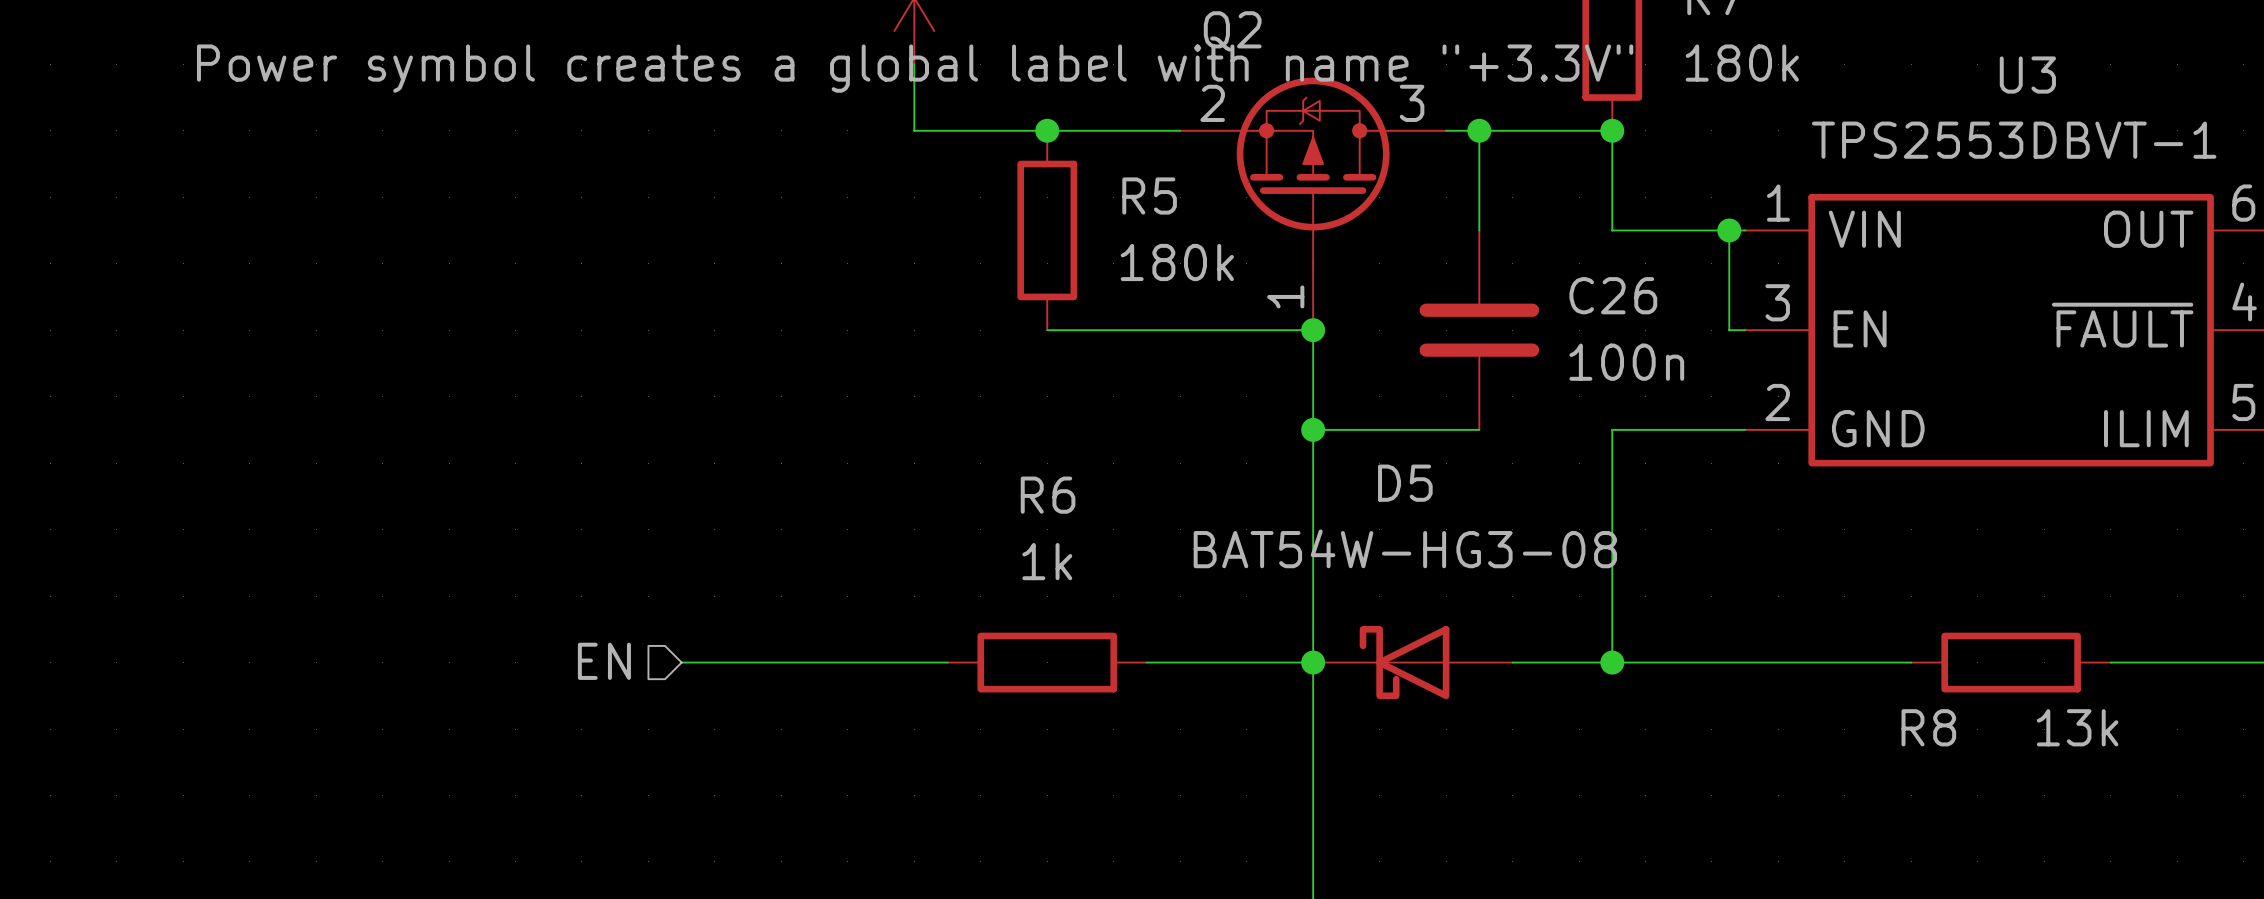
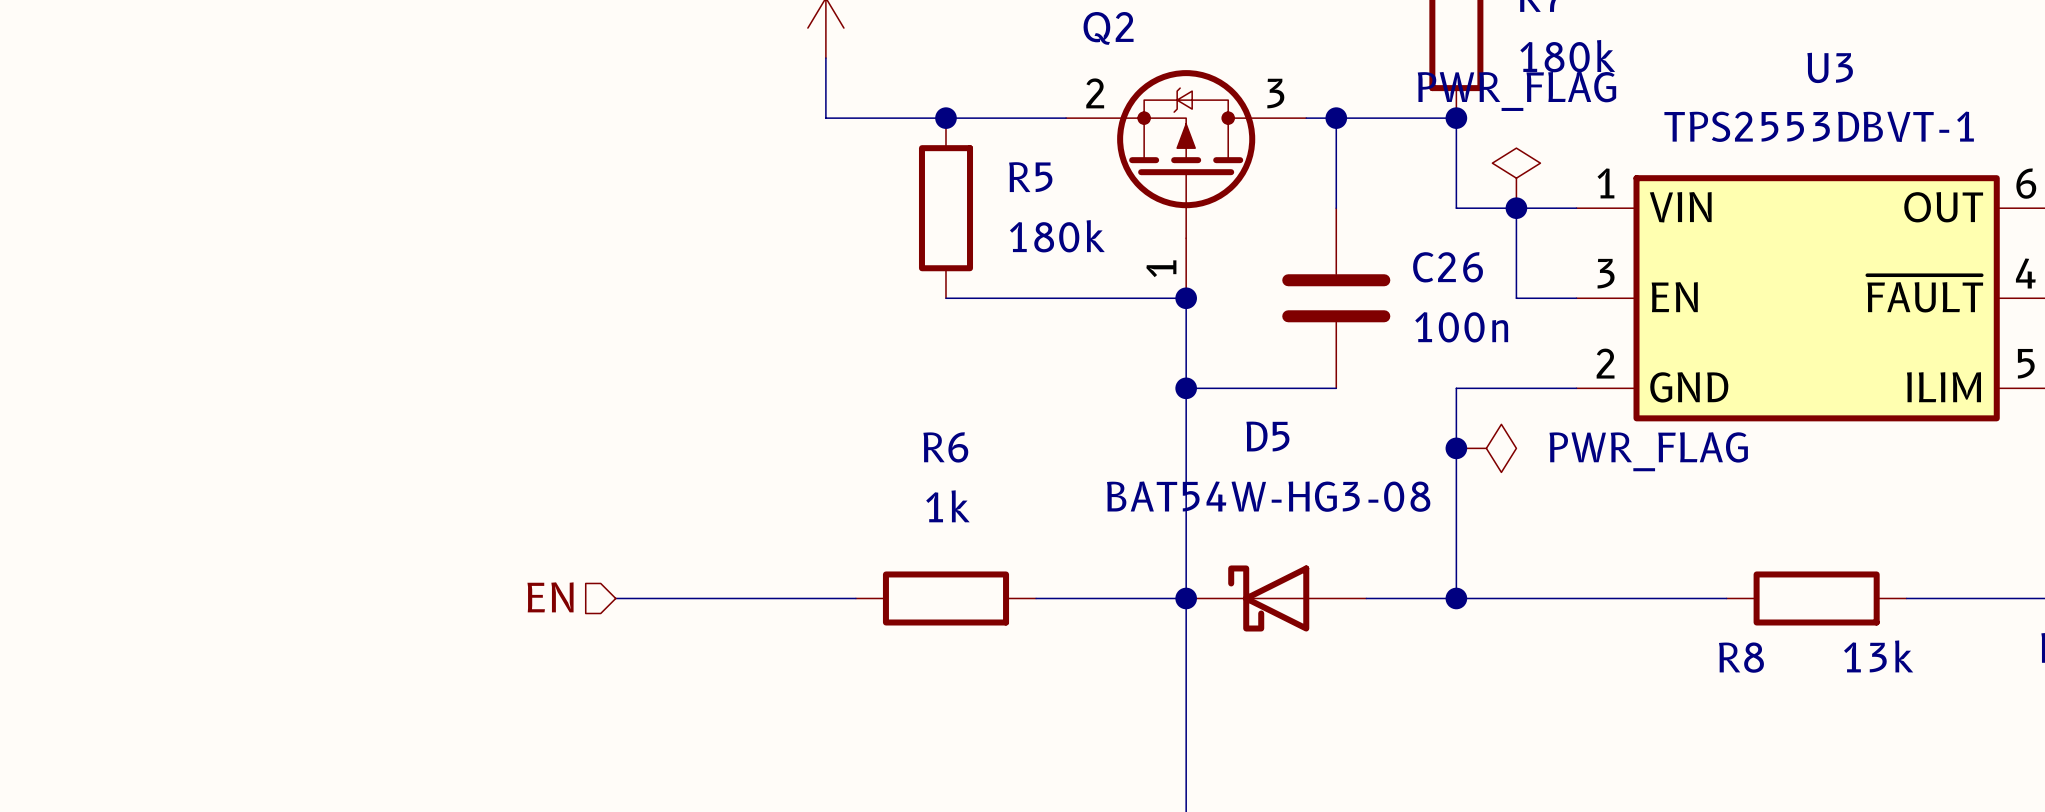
power symbol text: Power symbol creates a global label with name "+3.3V" (915, 68) -> none
power symbol: none -> PWR_FLAG (1516, 178)
wire: (1729, 230) (1729, 330) -> (1516, 208) (1516, 298) (1562, 298)
junction position: (1729, 230) -> (1516, 208)
junction: none -> (1456, 448)
power symbol: none -> PWR_FLAG (1486, 448)

